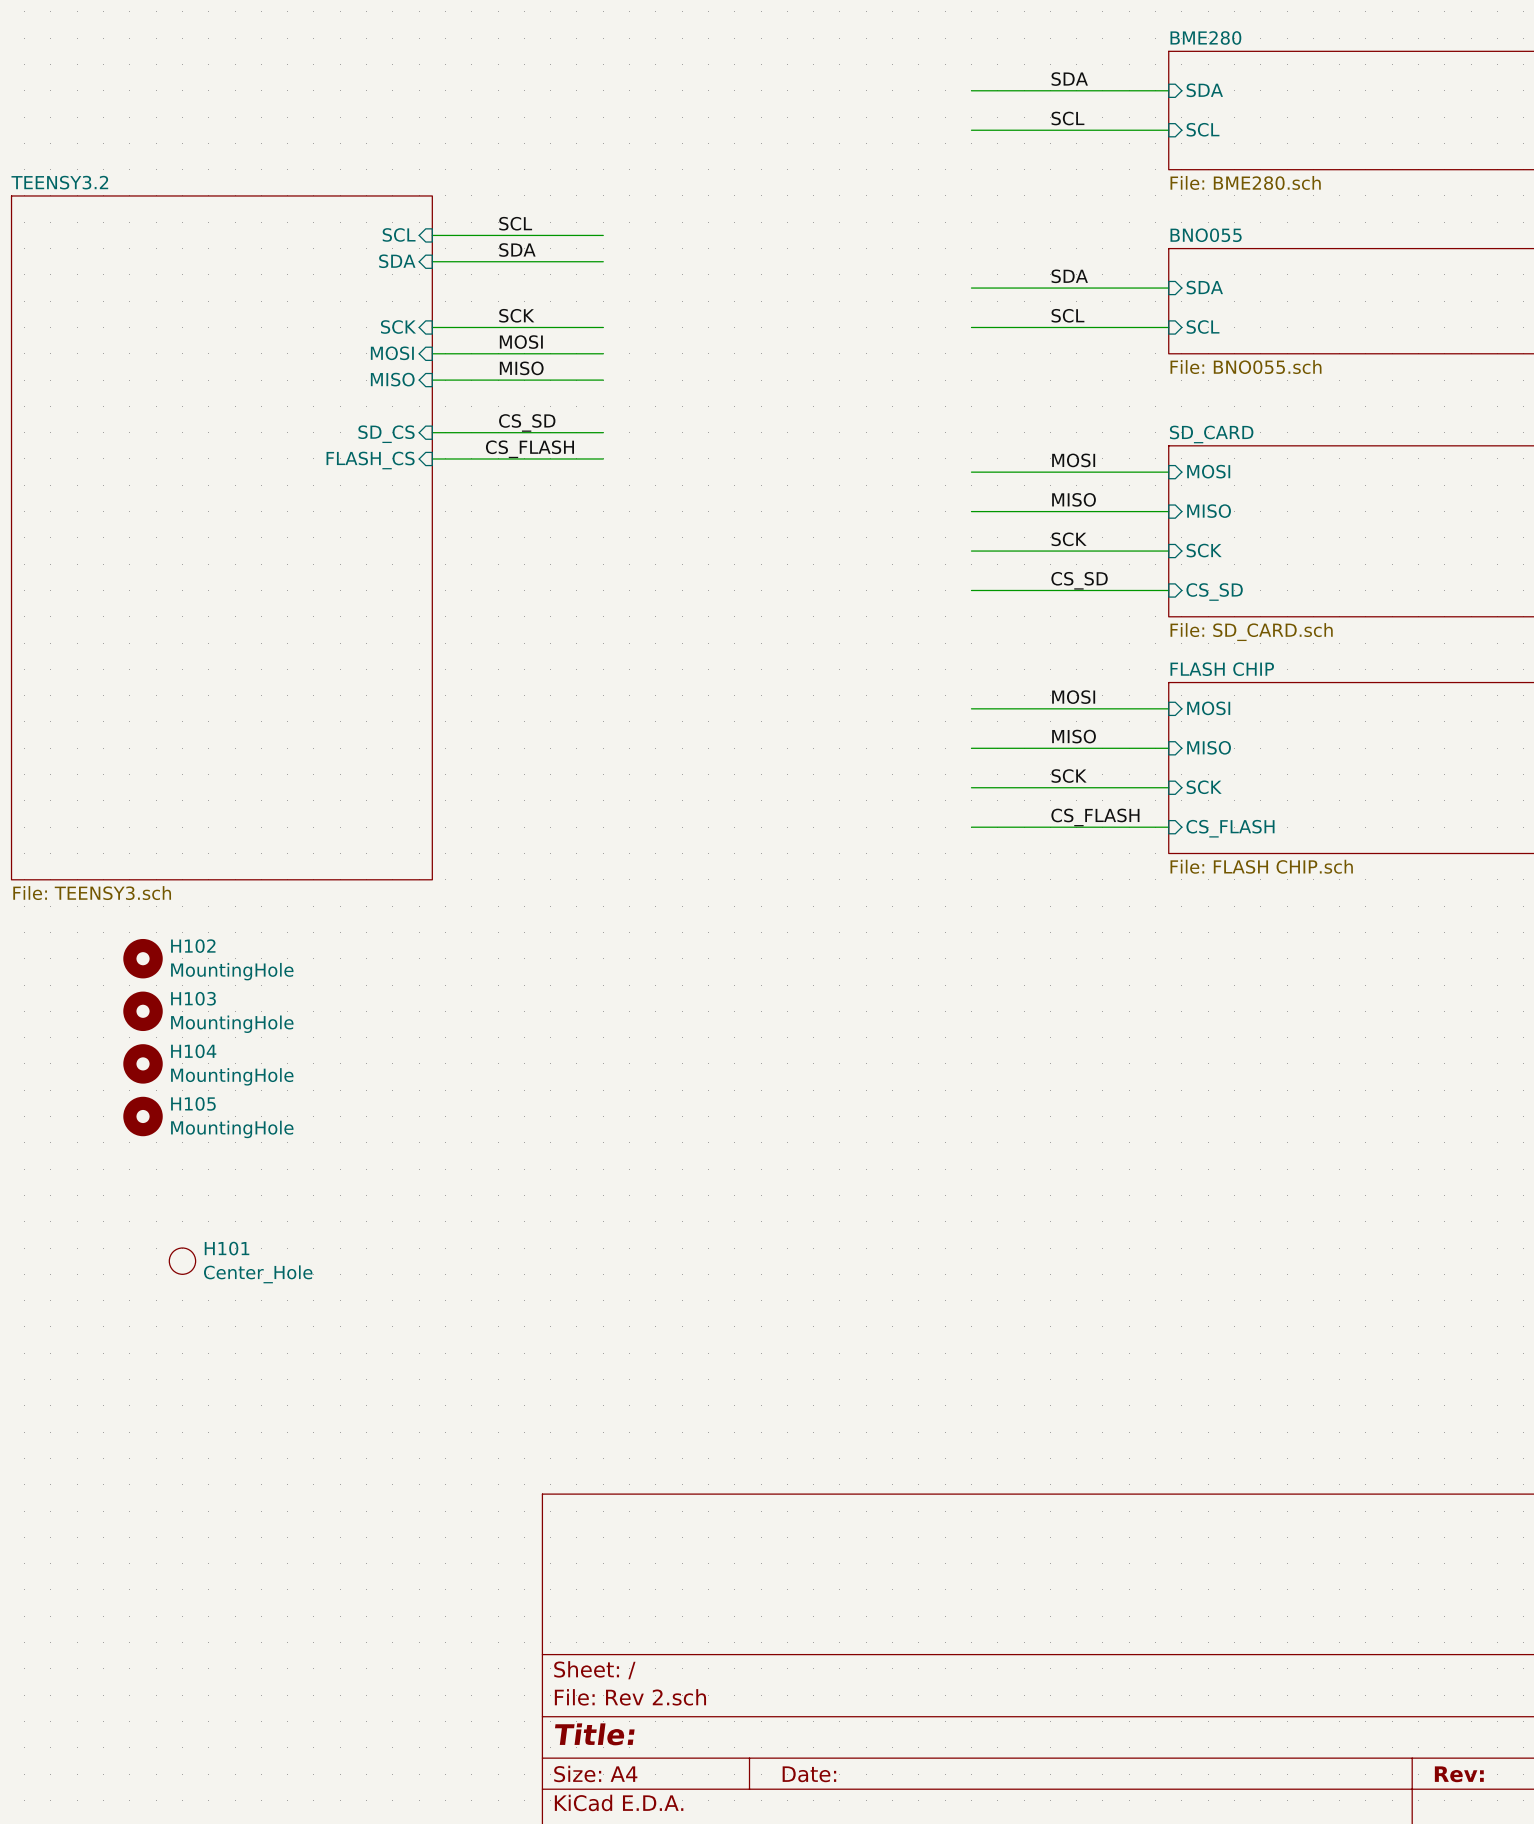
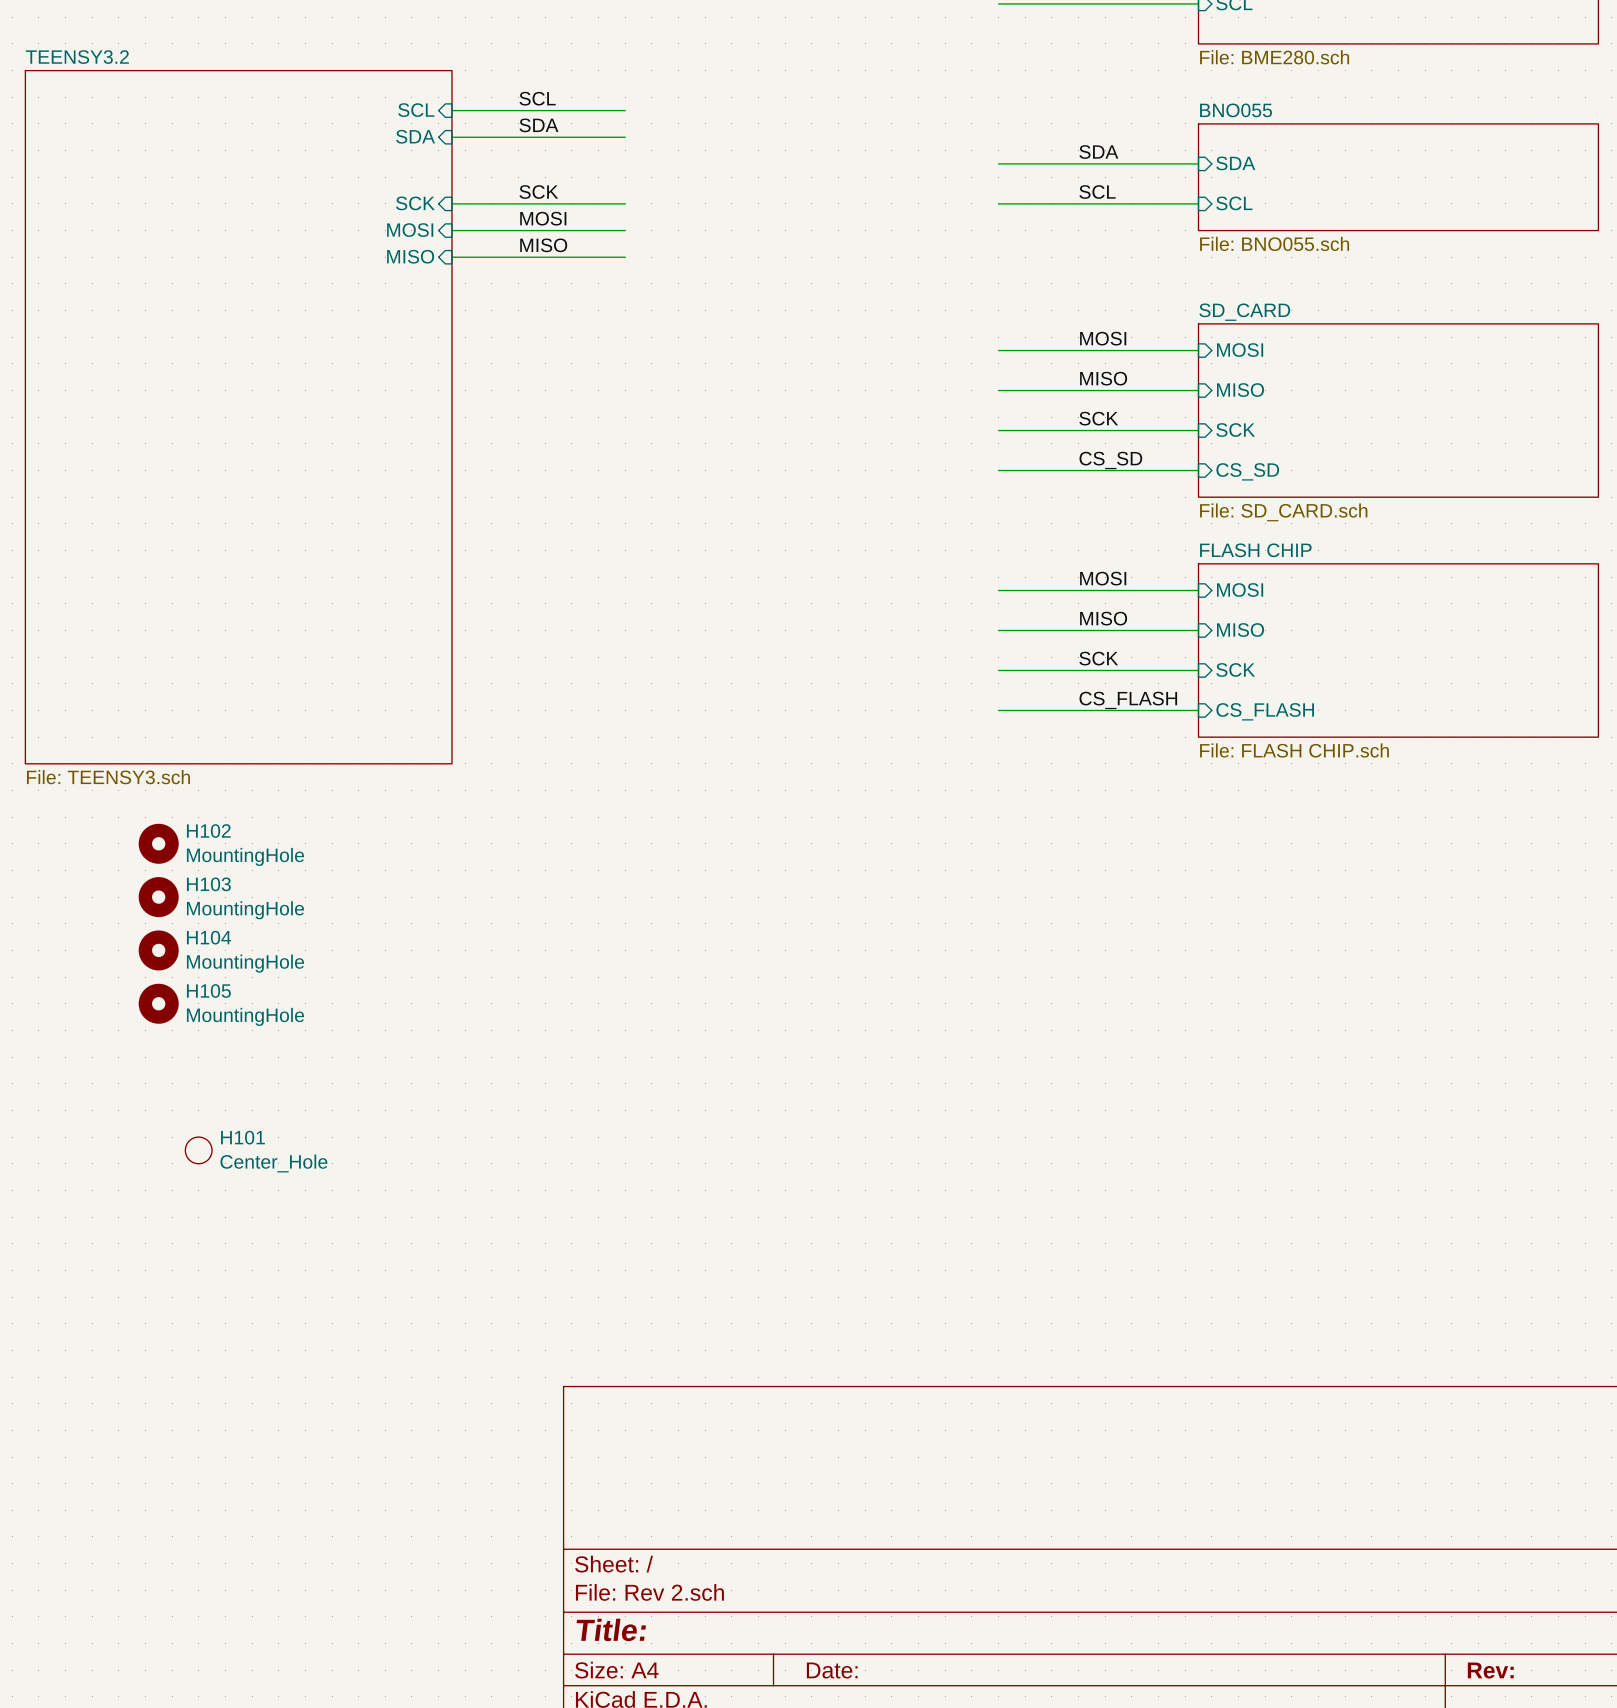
label: CS_SD (527, 422) -> none
wire: (432, 432) (603, 432) -> none
sheet pin: SD_CS (386, 434) -> none
label: CS_FLASH (529, 449) -> none
wire: (432, 458) (603, 458) -> none
sheet pin: FLASH_CS (370, 460) -> none

